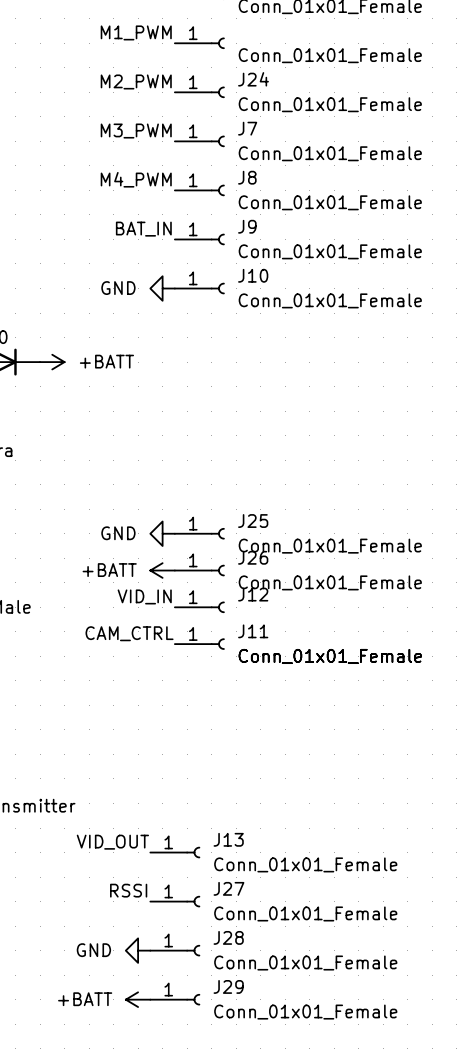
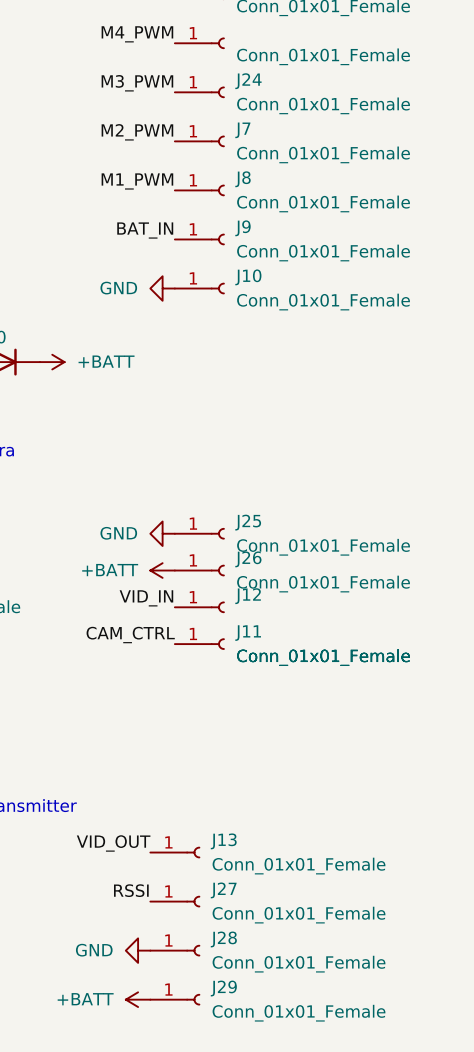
label: M1_PWM (136, 32) -> M4_PWM (137, 34)
label: M2_PWM (136, 81) -> M3_PWM (137, 83)
label: M3_PWM (136, 131) -> M2_PWM (137, 132)
label: M4_PWM (136, 179) -> M1_PWM (137, 181)

